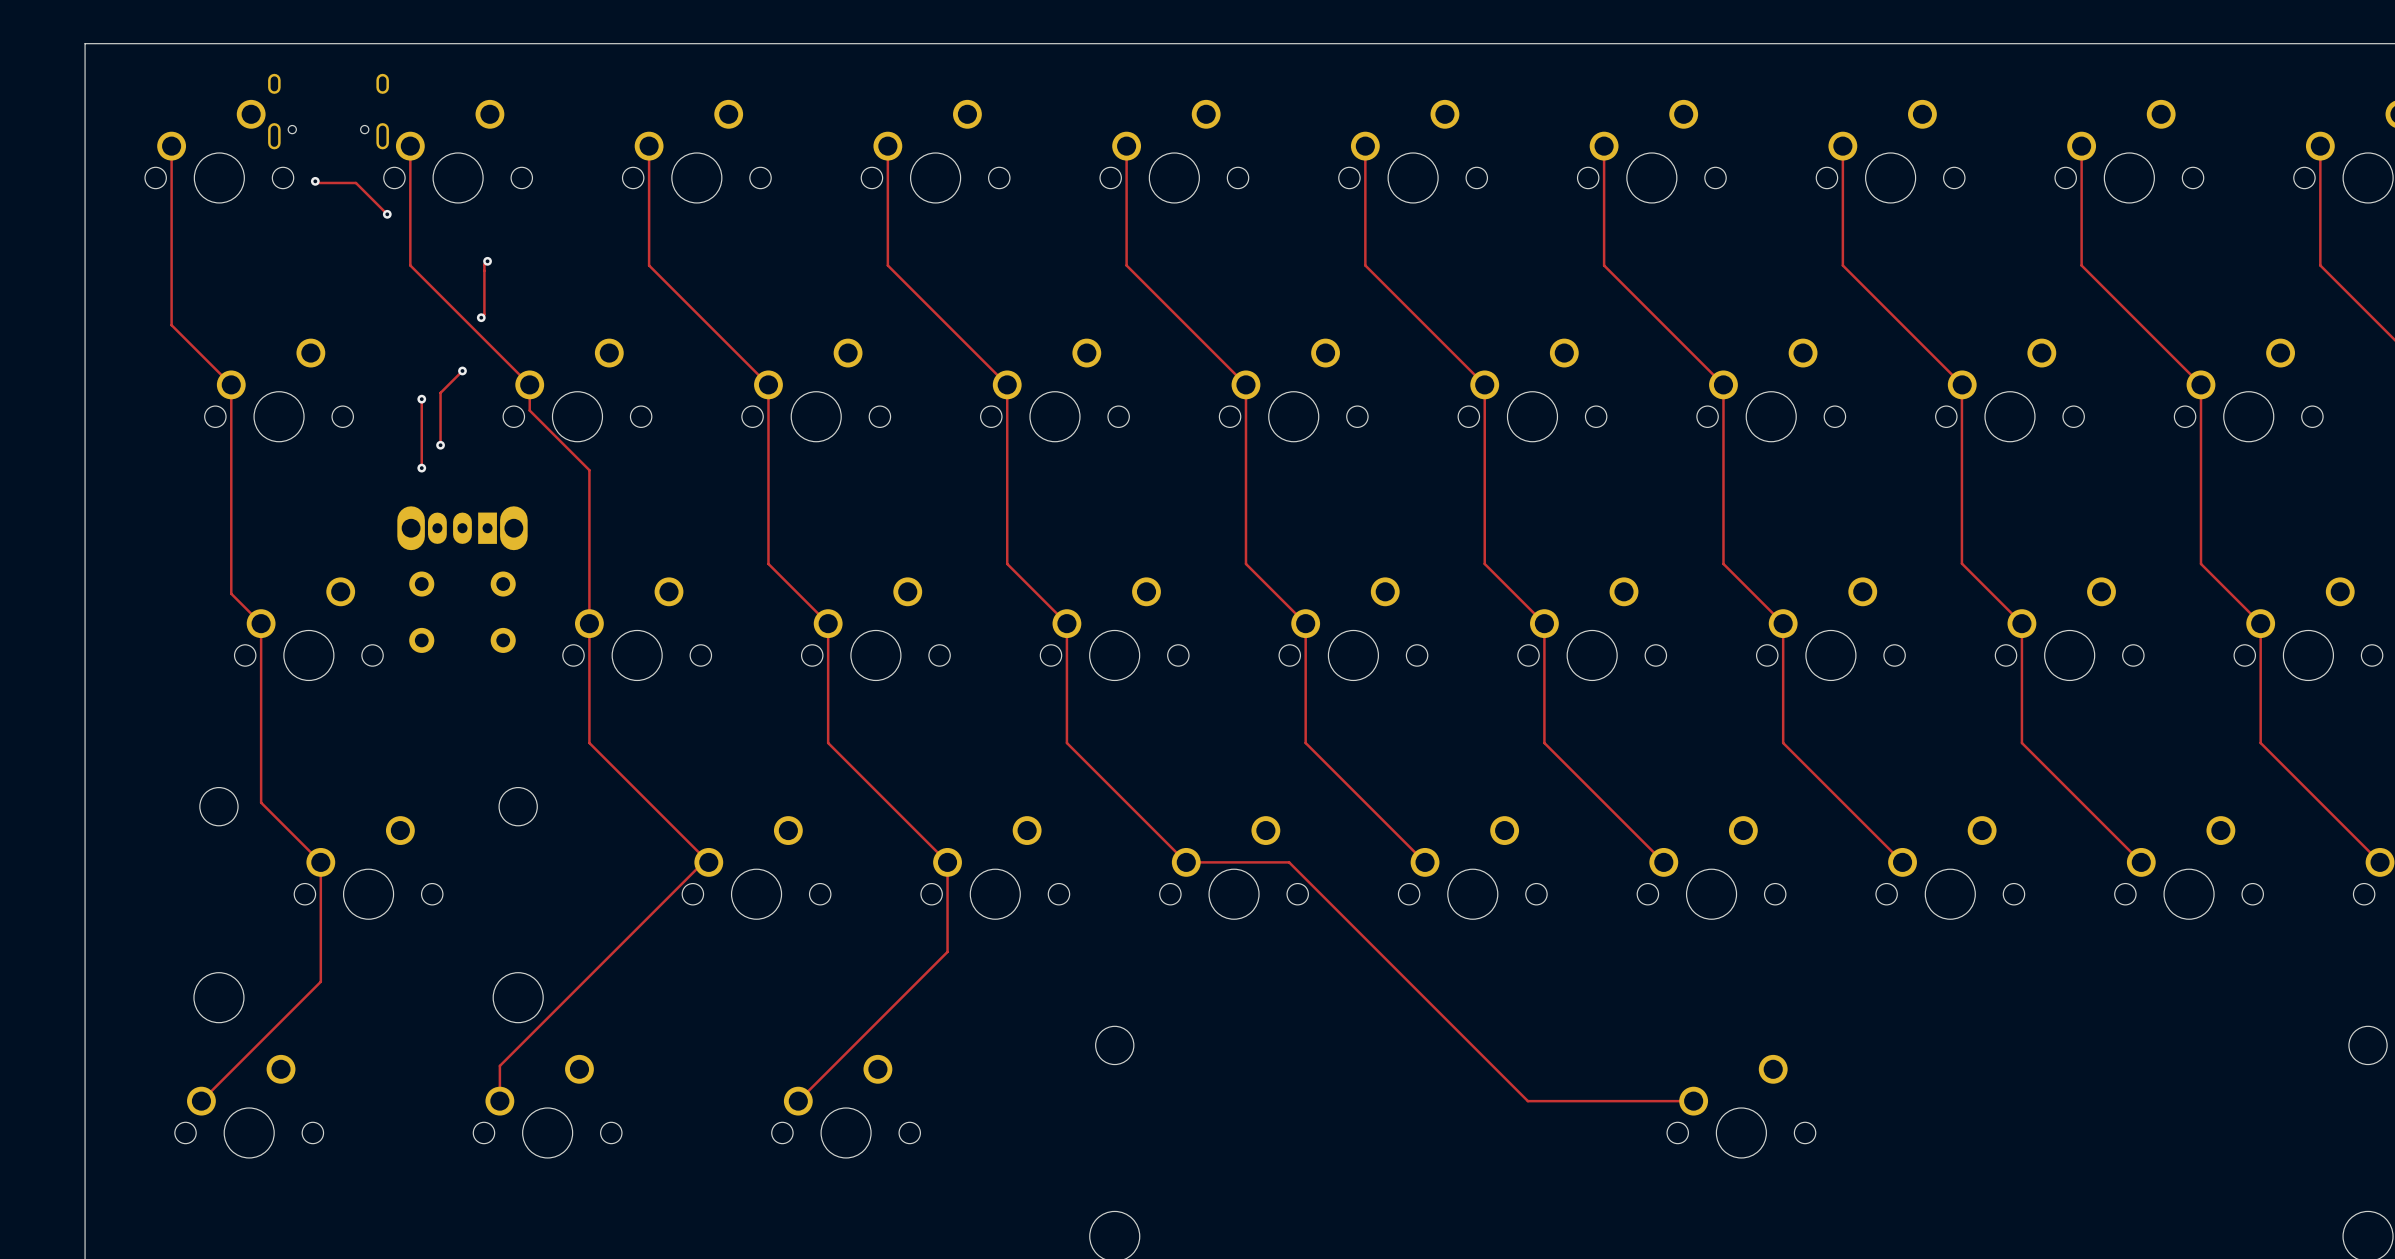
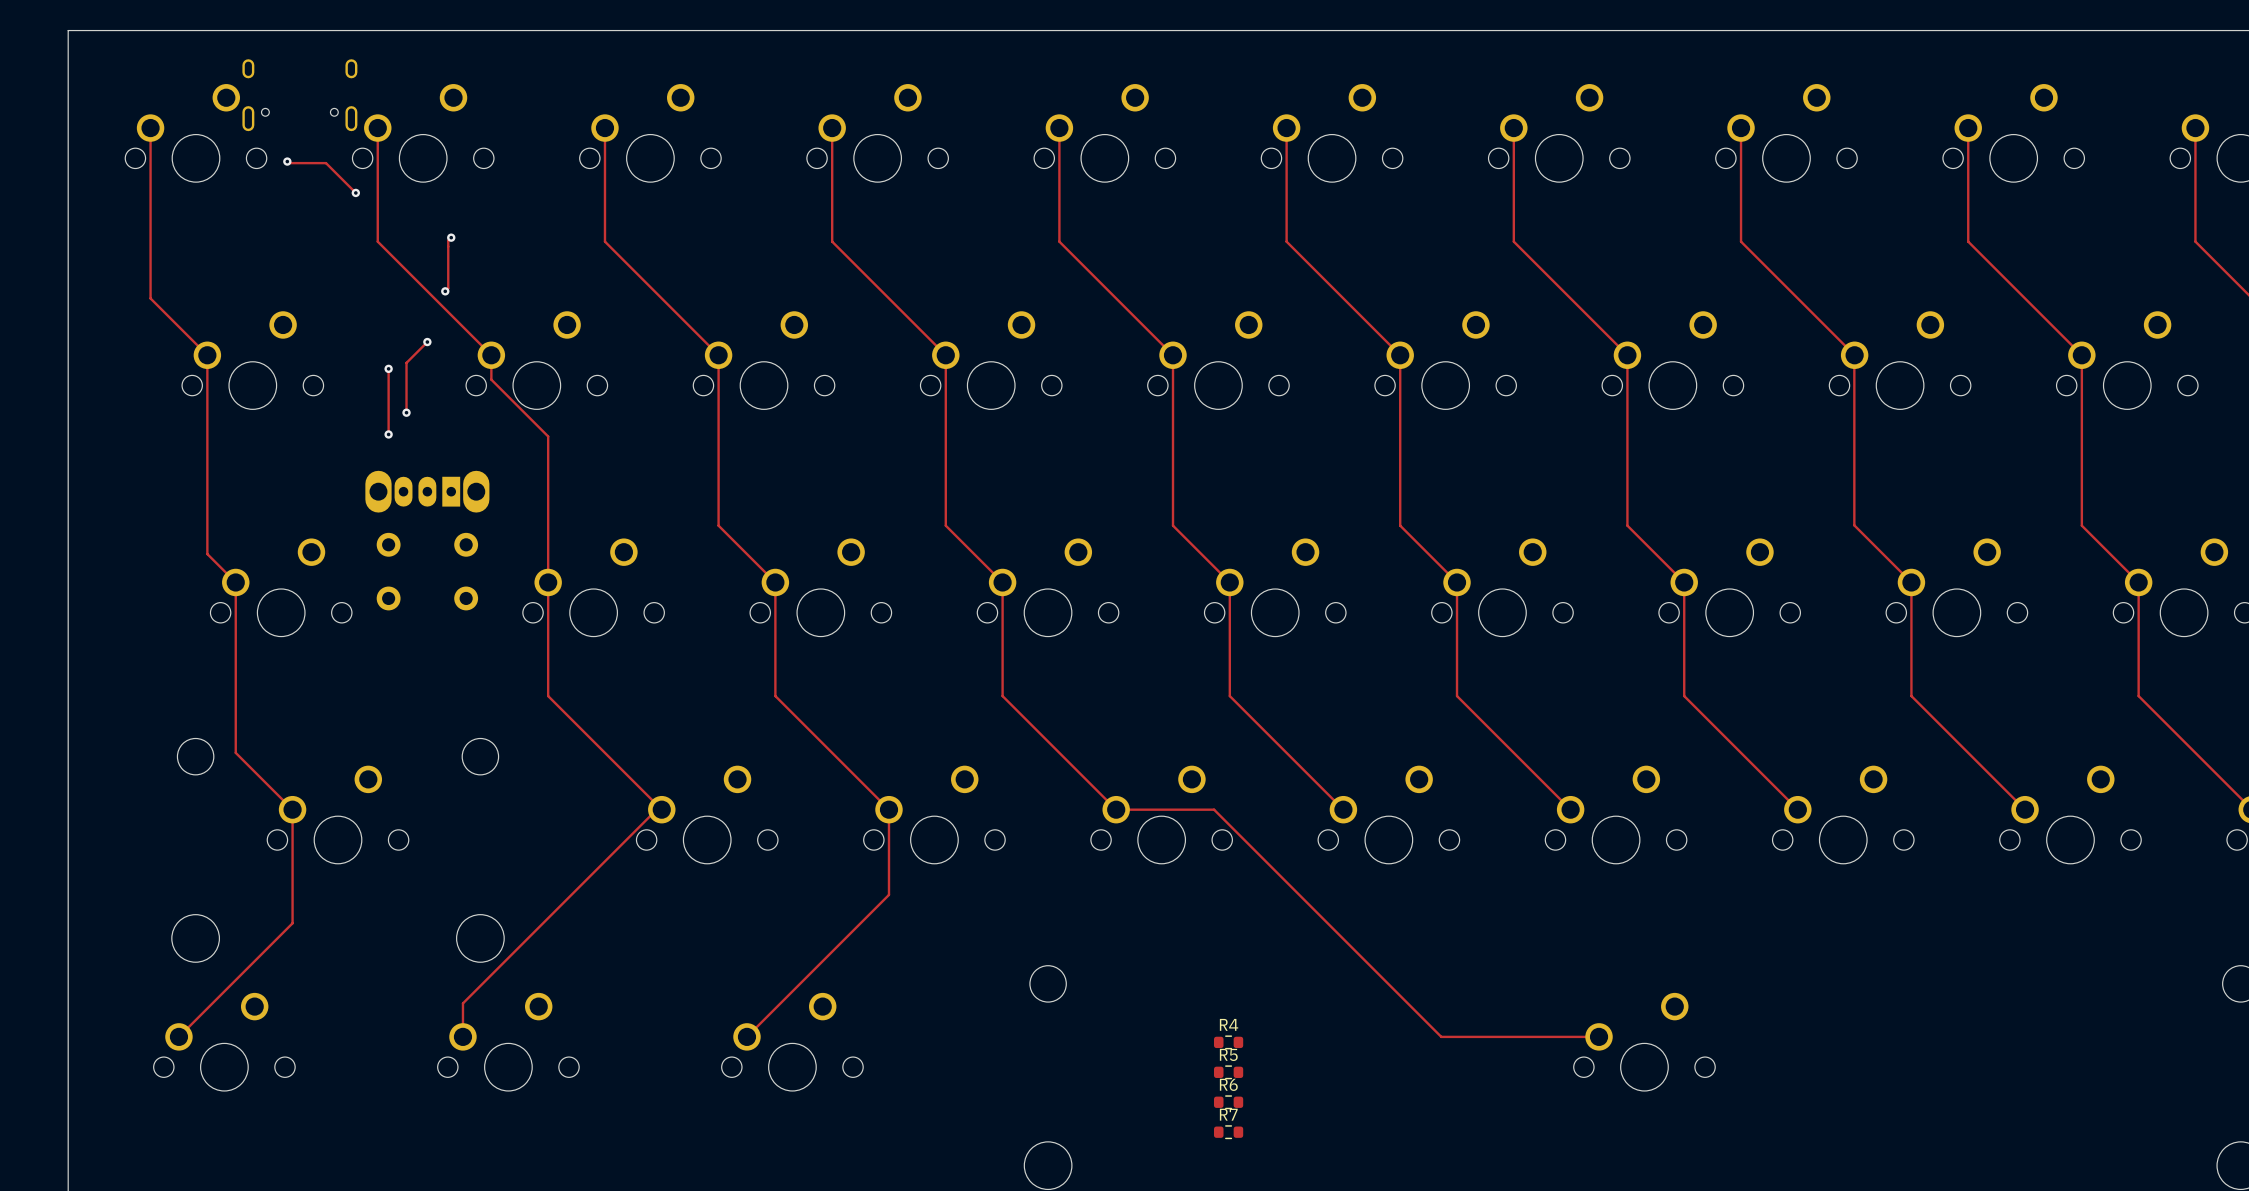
R4: none -> (1228, 1042)
R5: none -> (1228, 1072)
R6: none -> (1228, 1102)
R7: none -> (1228, 1132)

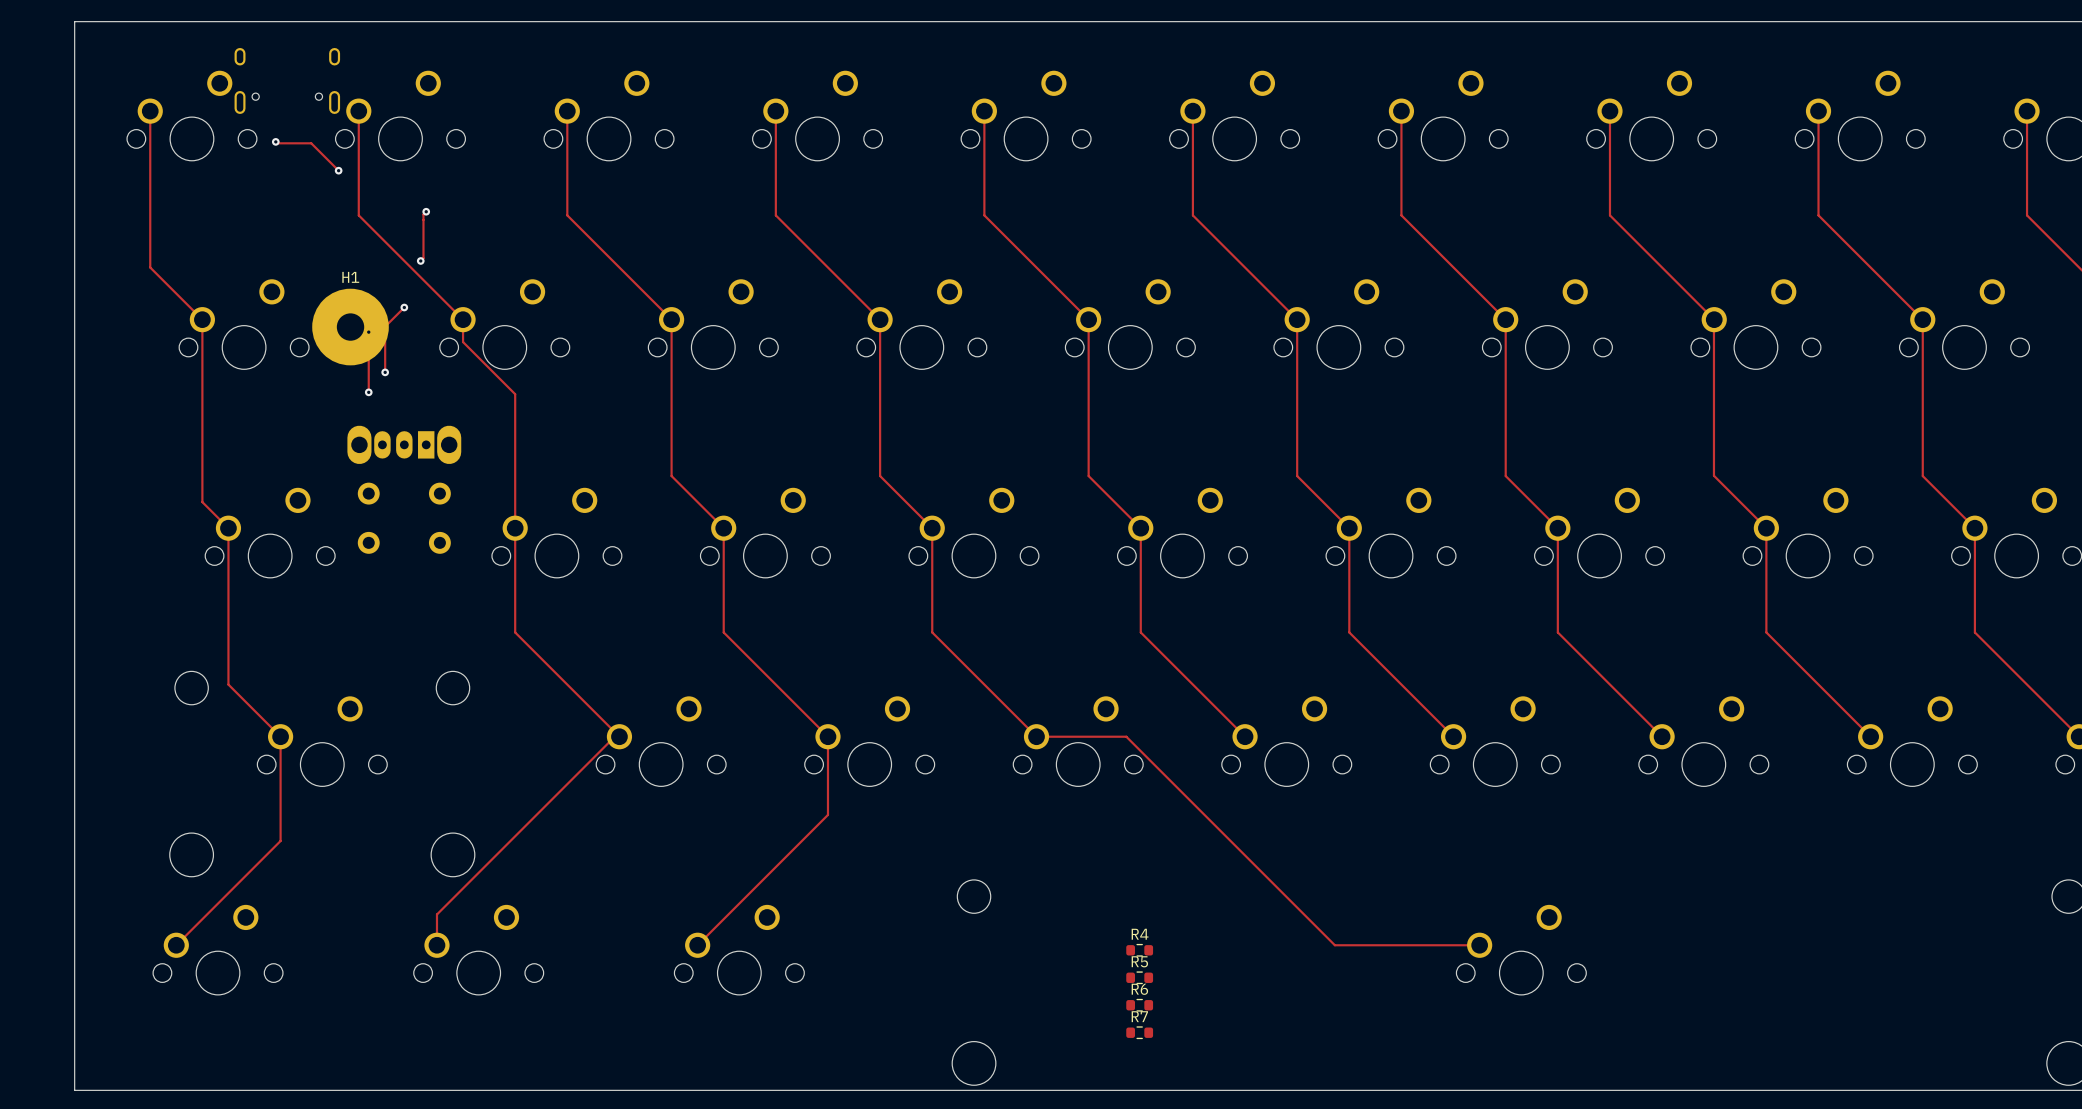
H1: none -> (350, 327)

